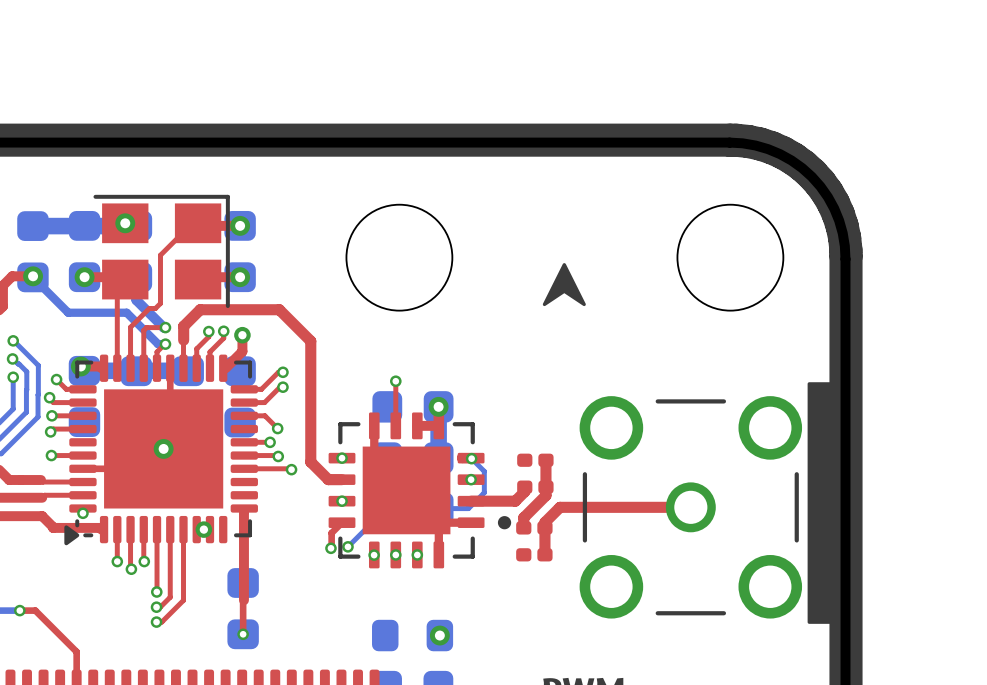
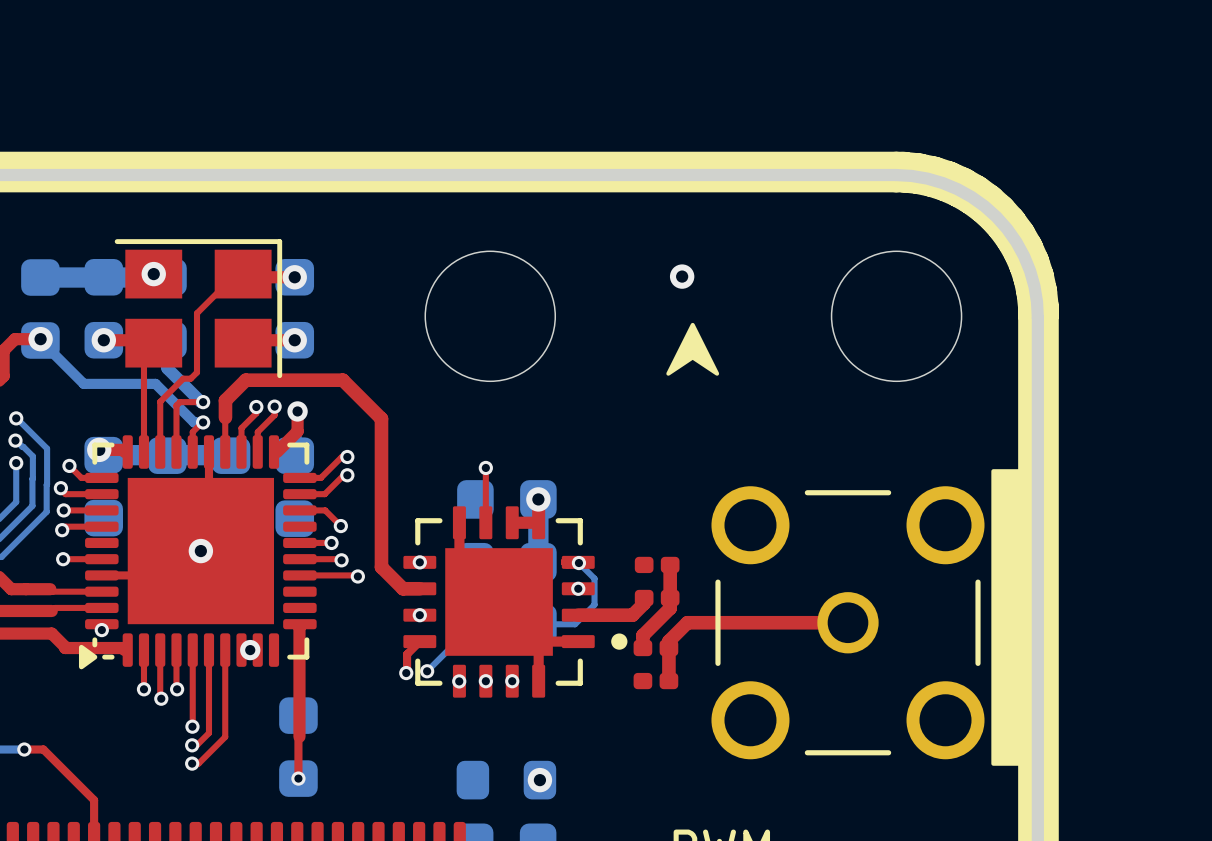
via: none -> (682, 276)

